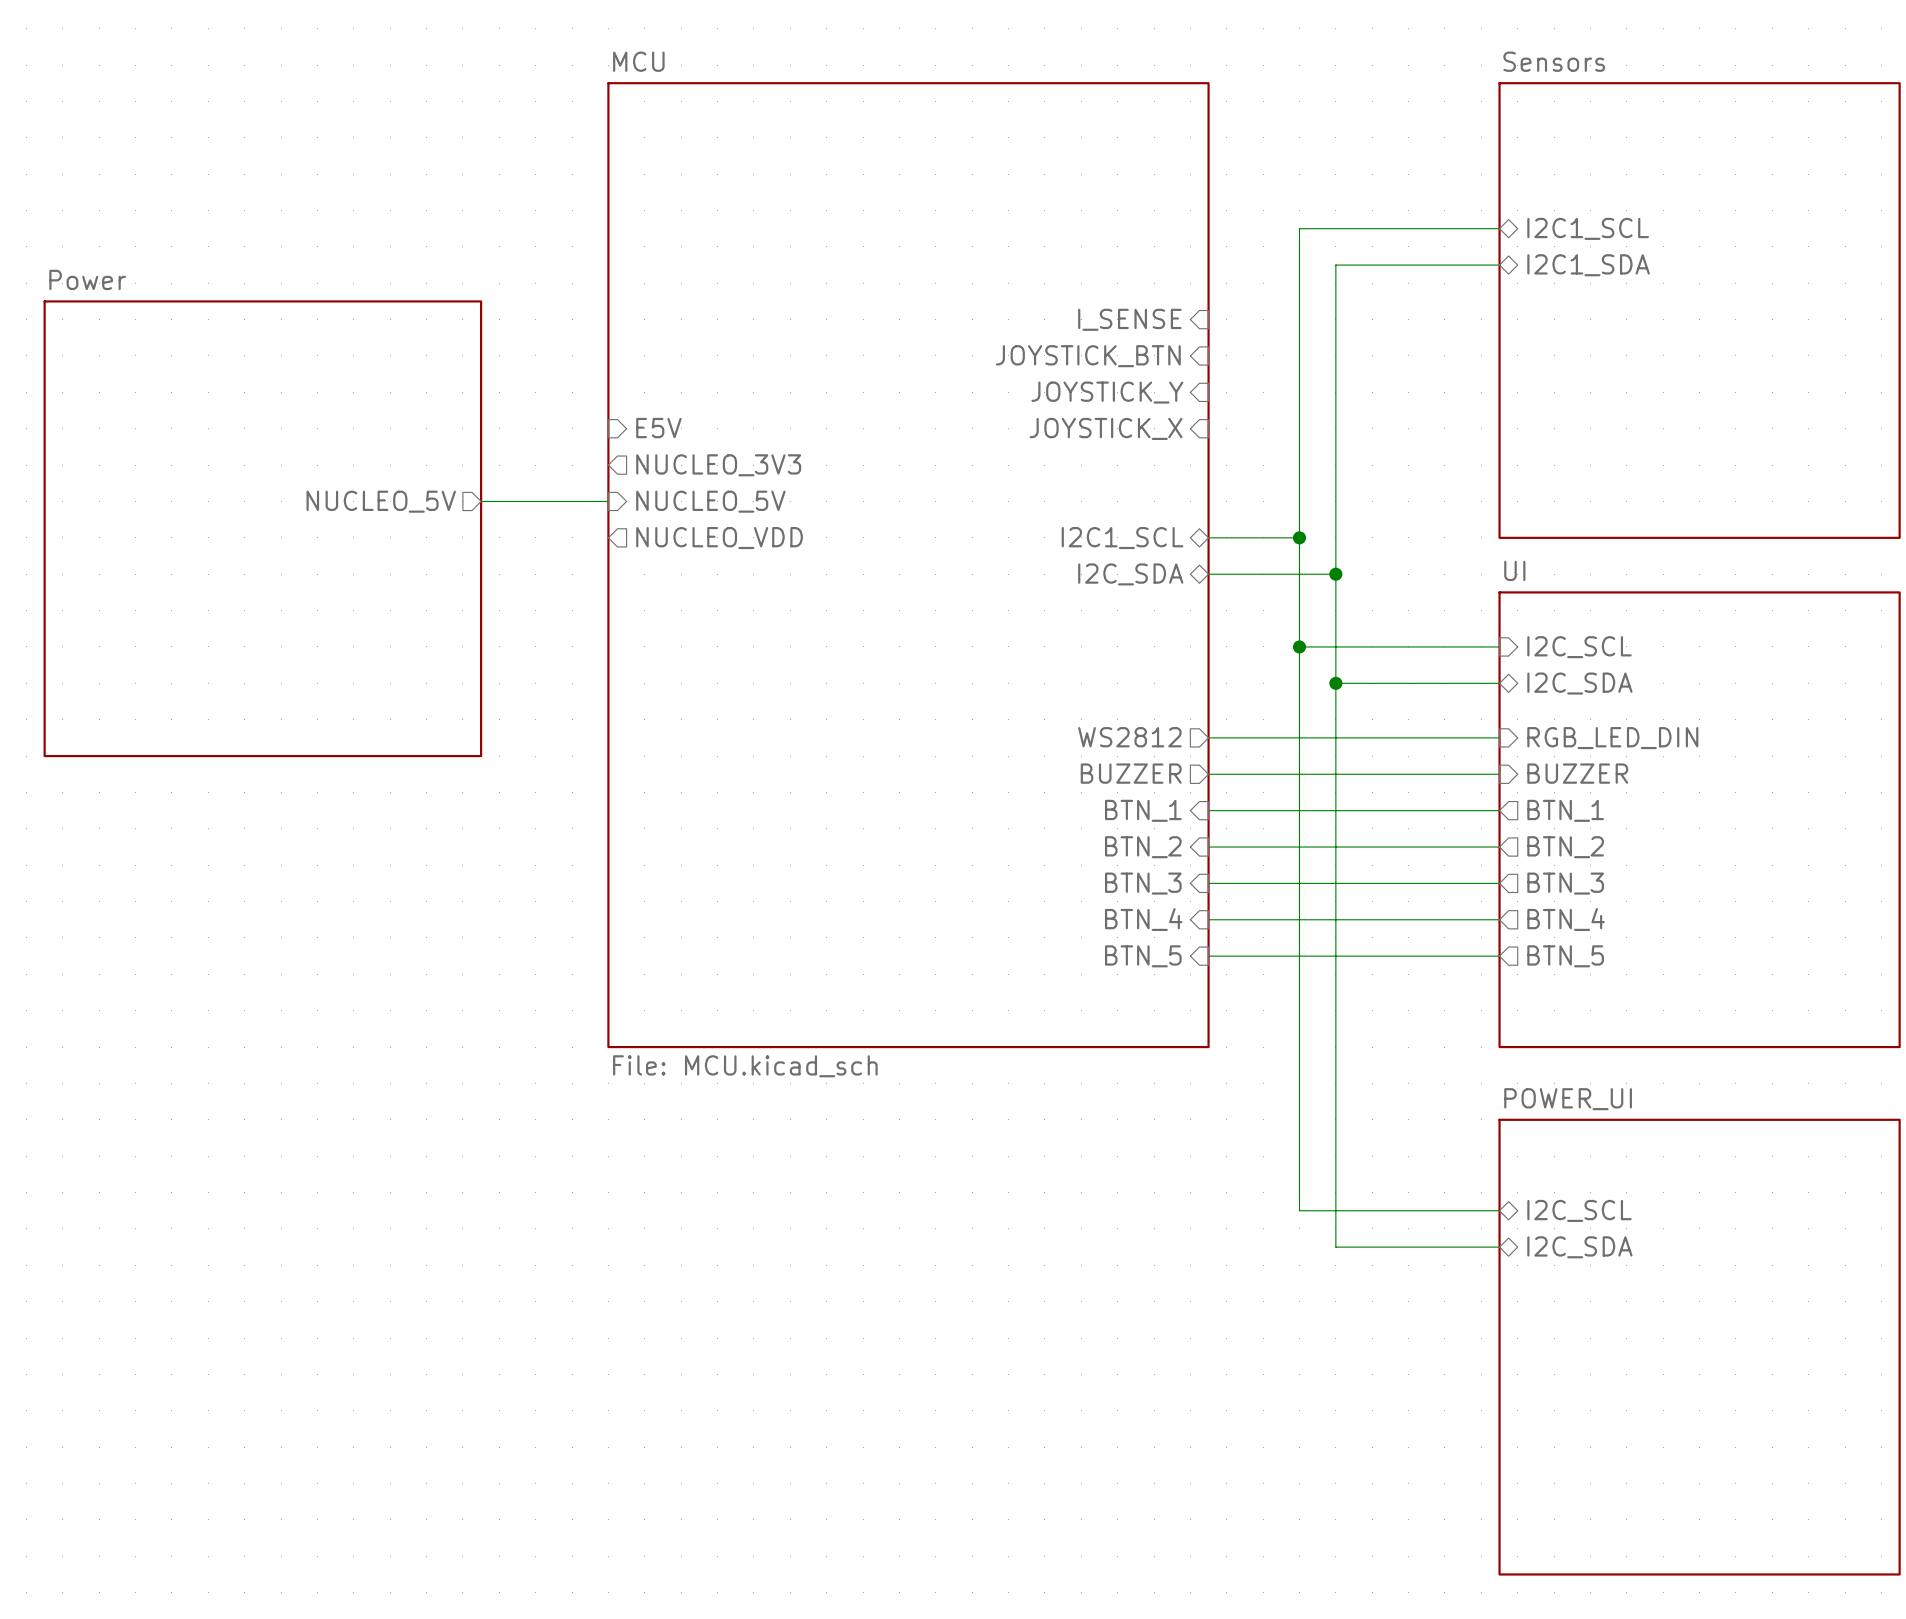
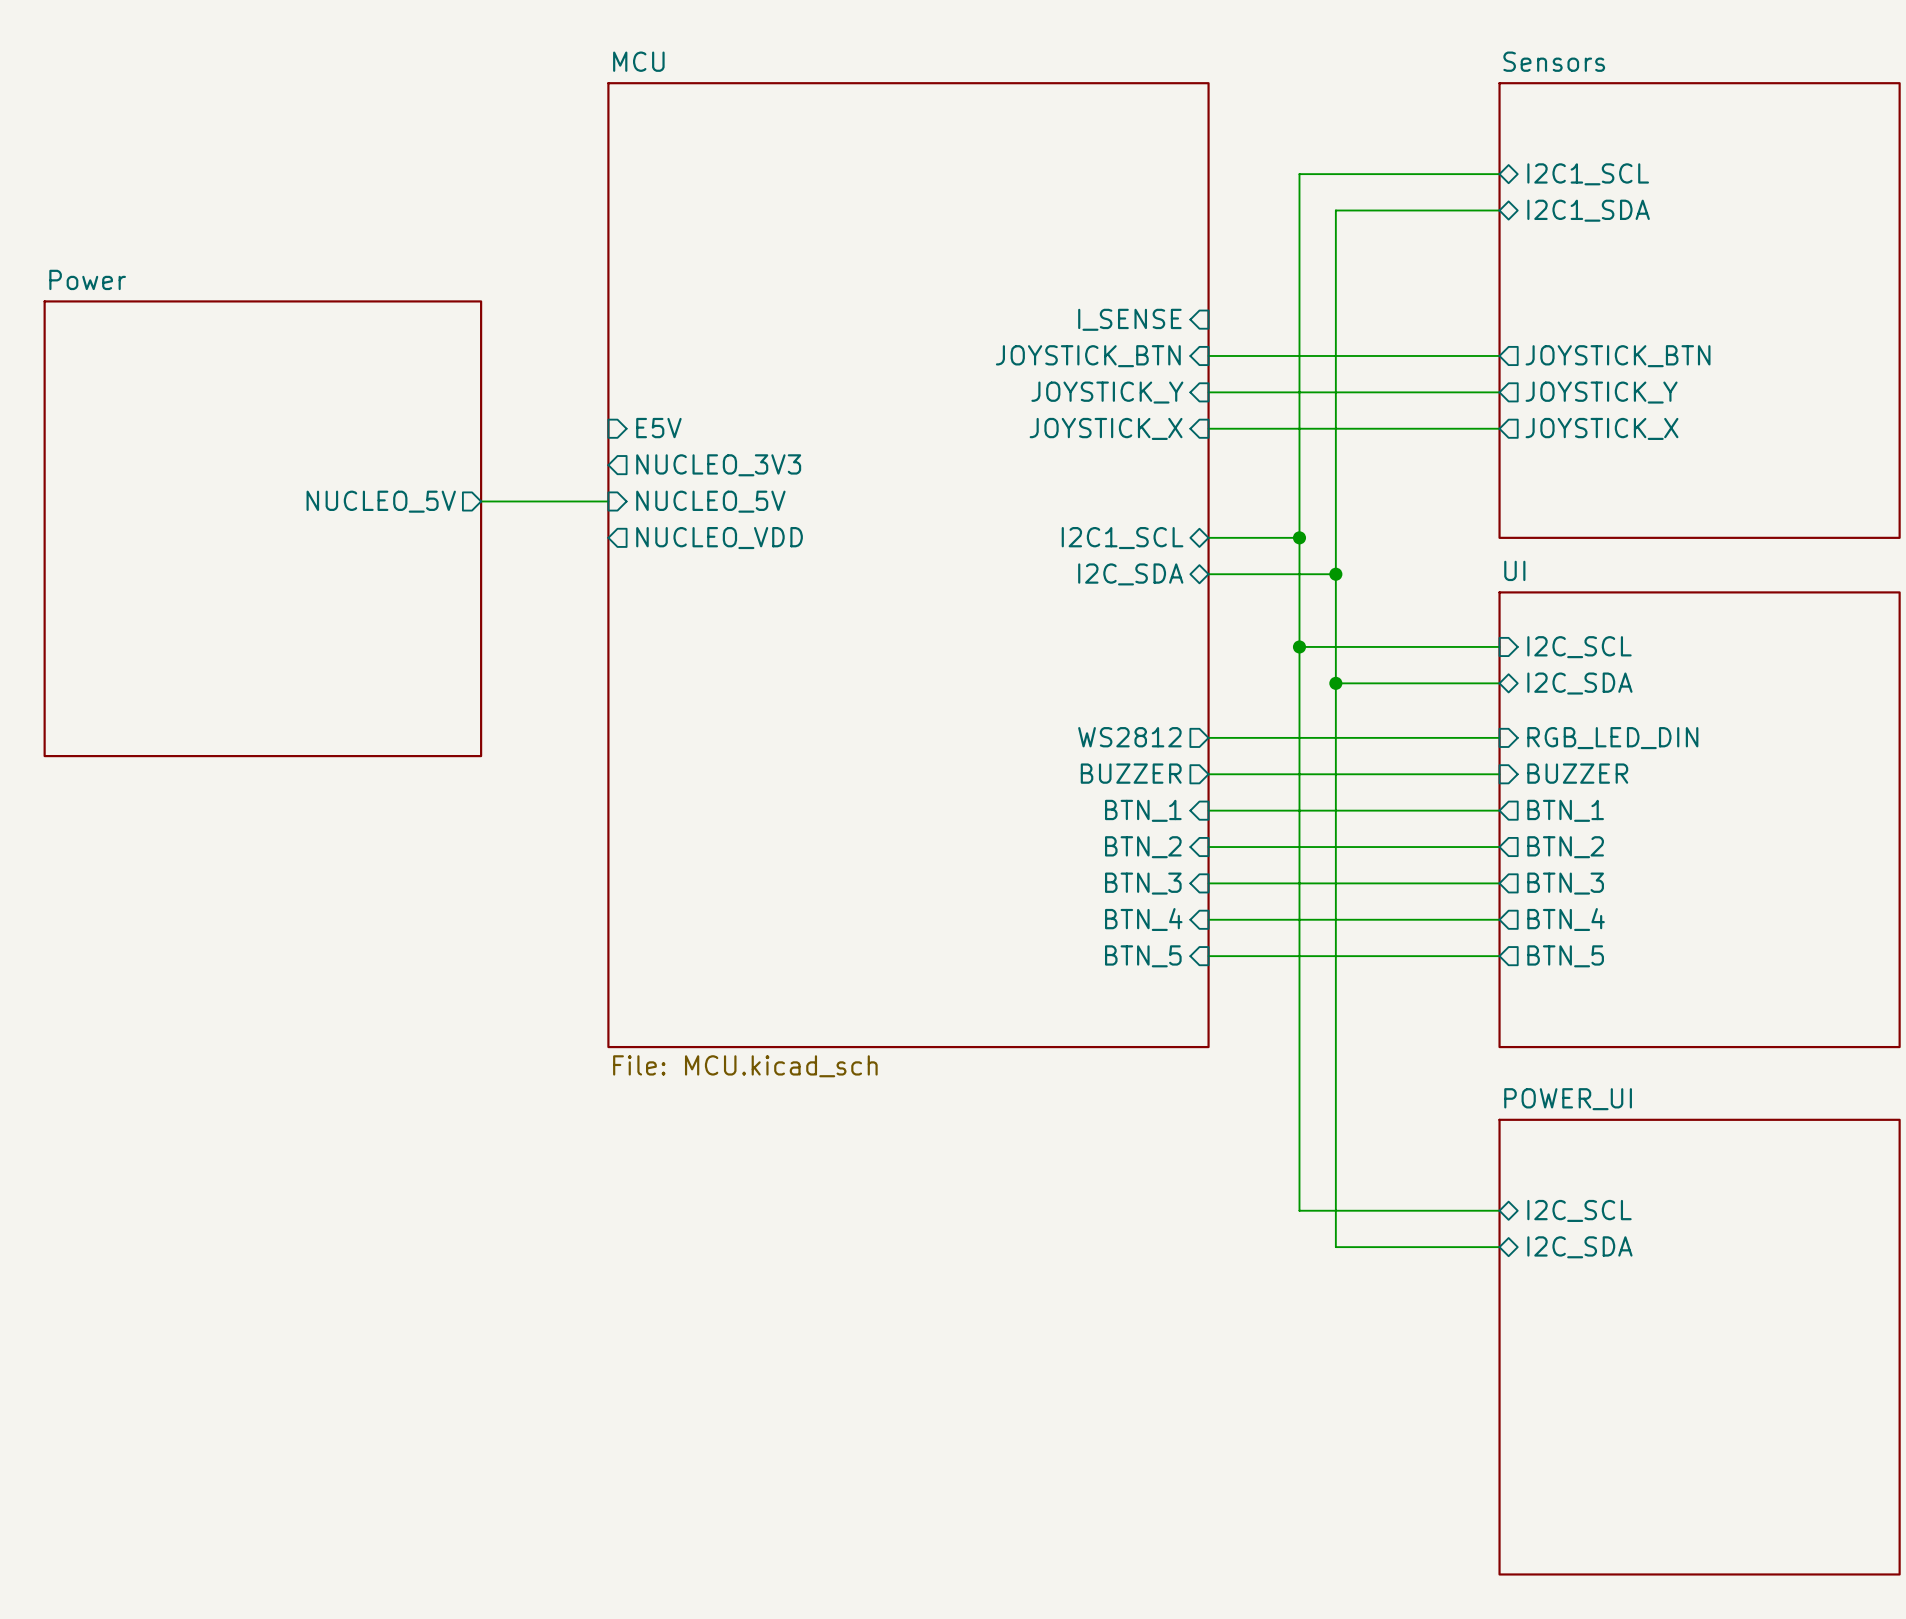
wire: (1299, 228) (1499, 228) -> (1299, 228) (1299, 174) (1499, 174)
sheet pin position: I2C1_SCL (1588, 228) -> I2C1_SCL (1588, 174)
wire: (1335, 265) (1499, 265) -> (1335, 265) (1335, 210) (1499, 210)
sheet pin position: I2C1_SDA (1588, 265) -> I2C1_SDA (1588, 210)
wire: none -> (1208, 355) (1499, 355)
sheet pin: none -> JOYSTICK_BTN (1618, 356)
wire: none -> (1208, 392) (1499, 392)
sheet pin: none -> JOYSTICK_Y (1601, 392)
wire: none -> (1208, 428) (1499, 428)
sheet pin: none -> JOYSTICK_X (1602, 428)

